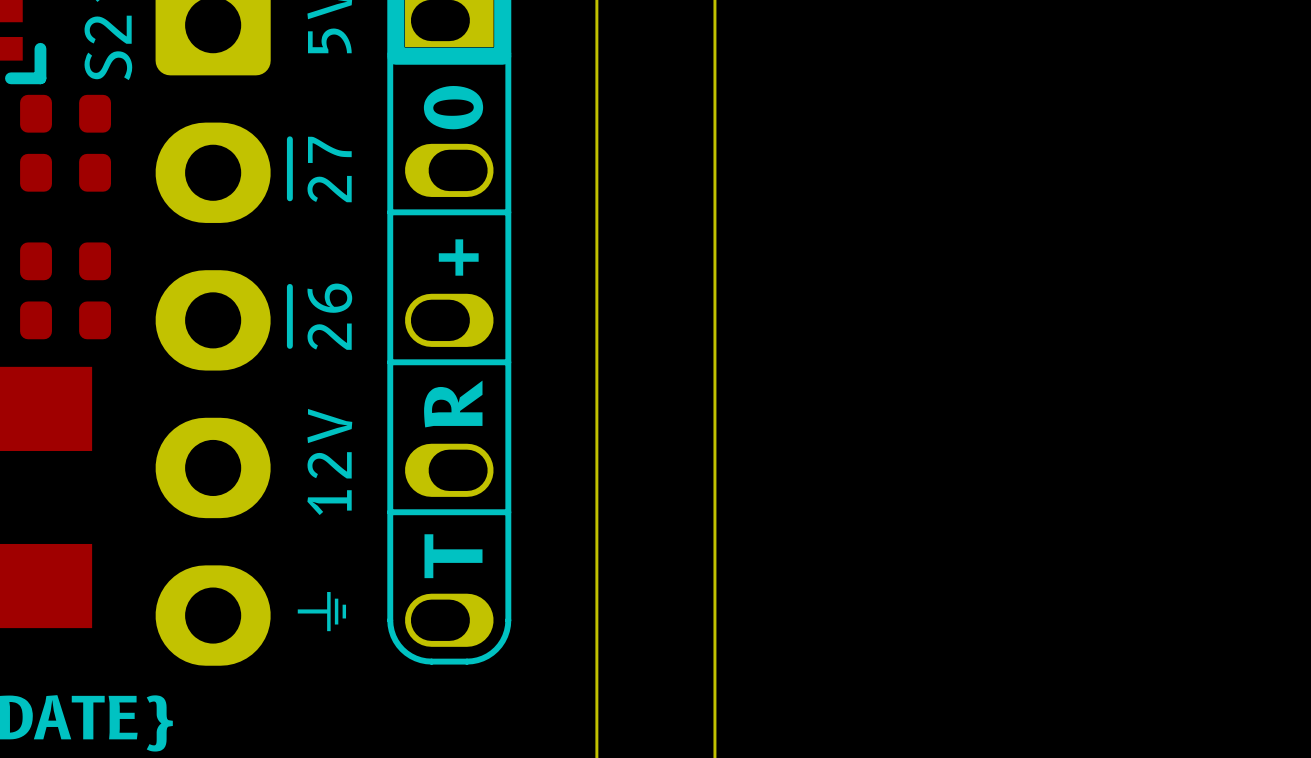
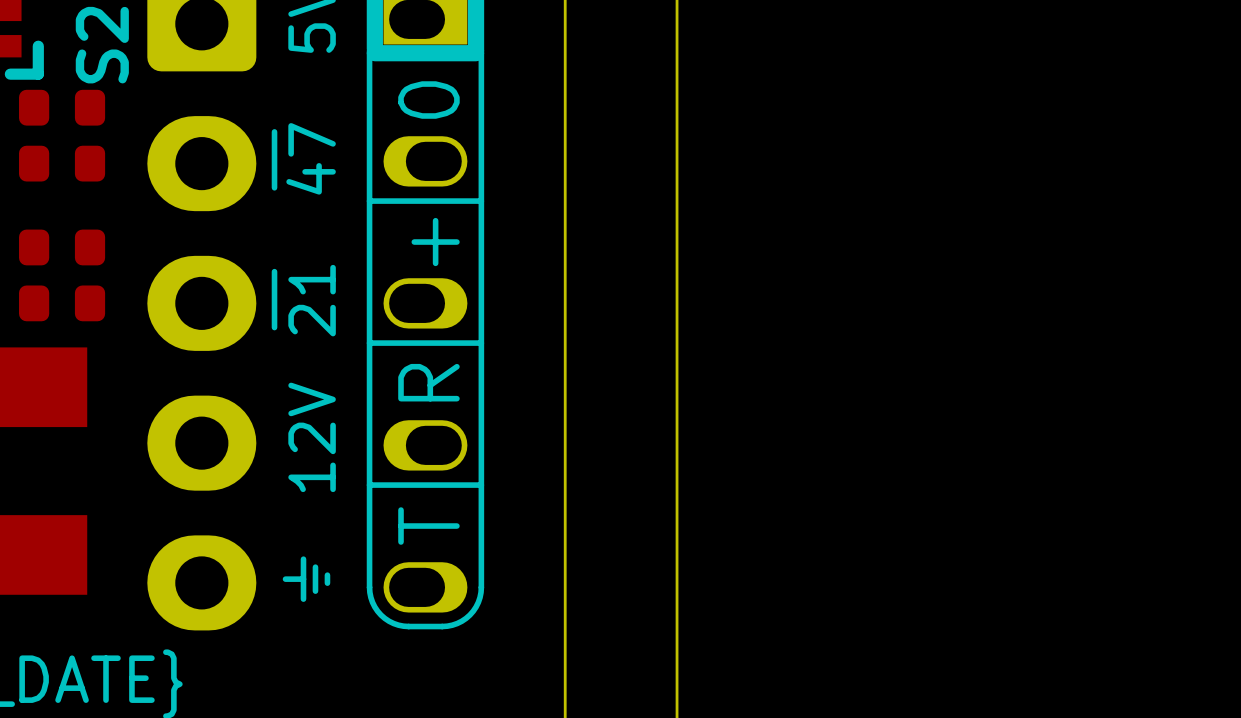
text: 27 (329, 169) -> 47 (311, 158)
text: 26 (329, 316) -> 21 (312, 300)

